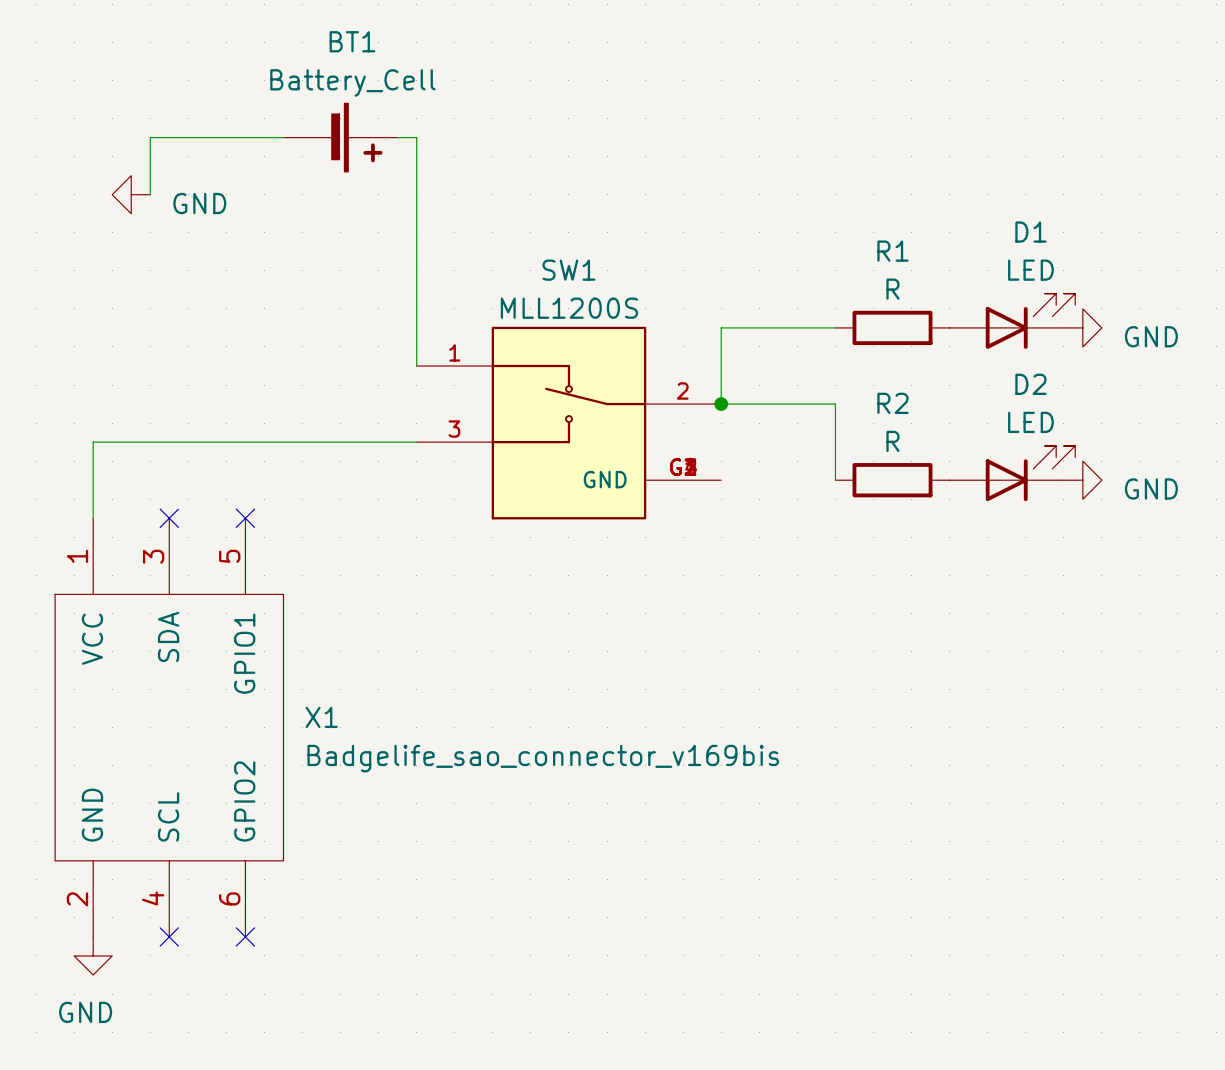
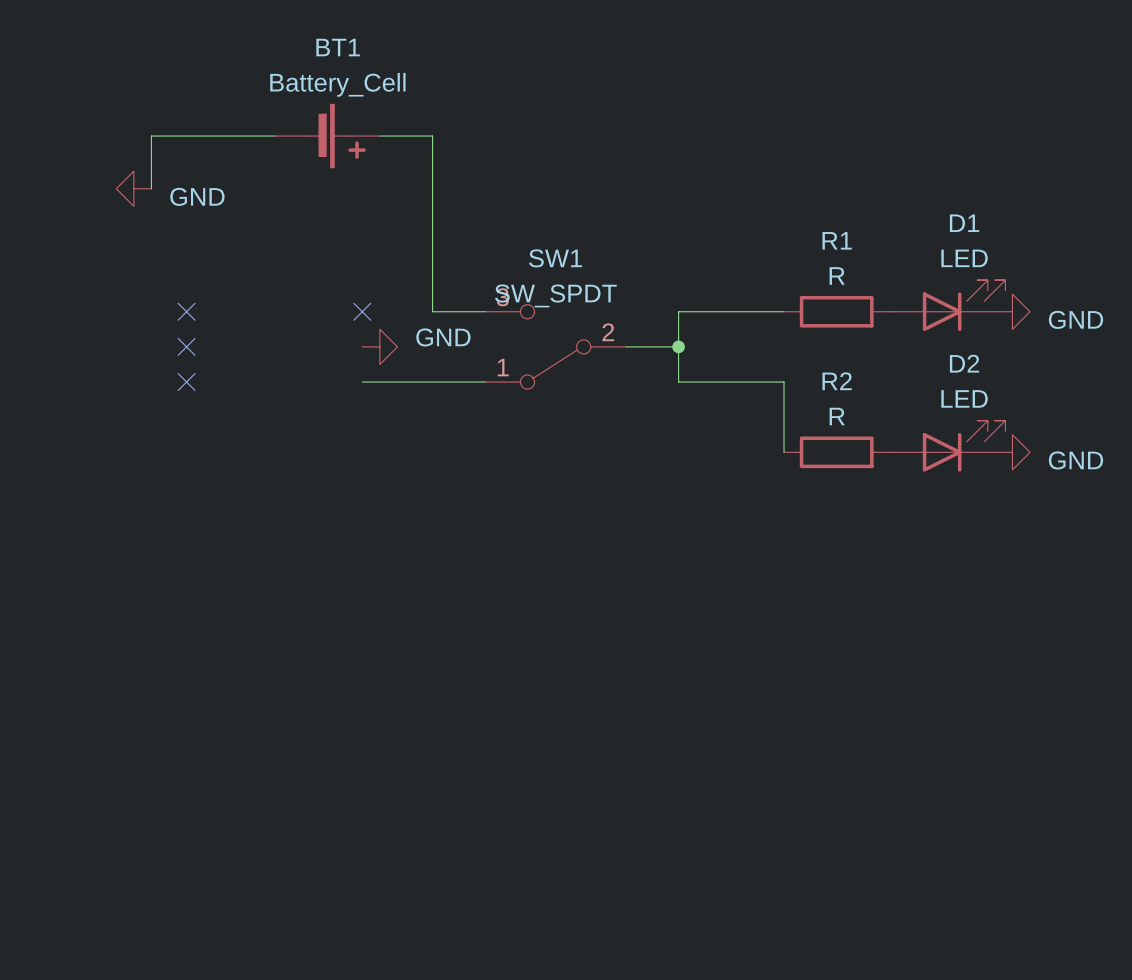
wire: (416, 137) (416, 366) -> (397, 136) (432, 136) (432, 311) (485, 311)
SW1 name position: SW1 (568, 270) -> SW1 (555, 258)
SW1 value: MLL1200S (569, 308) -> SW_SPDT (555, 295)
SW1 symbol: [416, 326, 722, 520] -> [485, 304, 626, 390]
no-connect mark: none -> (186, 311)
no-connect mark: none -> (362, 311)
no-connect mark: none -> (186, 346)
power symbol: none -> GND (379, 346)
wire: none -> (625, 346) (678, 346)
no-connect mark: none -> (186, 382)
wire: none -> (362, 382) (485, 382)
junction position: (721, 404) -> (678, 346)
wire: (416, 442) (93, 442) (93, 518) -> none
no-connect mark: (169, 518) -> none
no-connect mark: (245, 518) -> none
X1: Badgelife_sao_connector_v169bis (169, 727) -> none
no-connect mark: (169, 936) -> none
no-connect mark: (245, 936) -> none
power symbol: GND (93, 955) -> none

